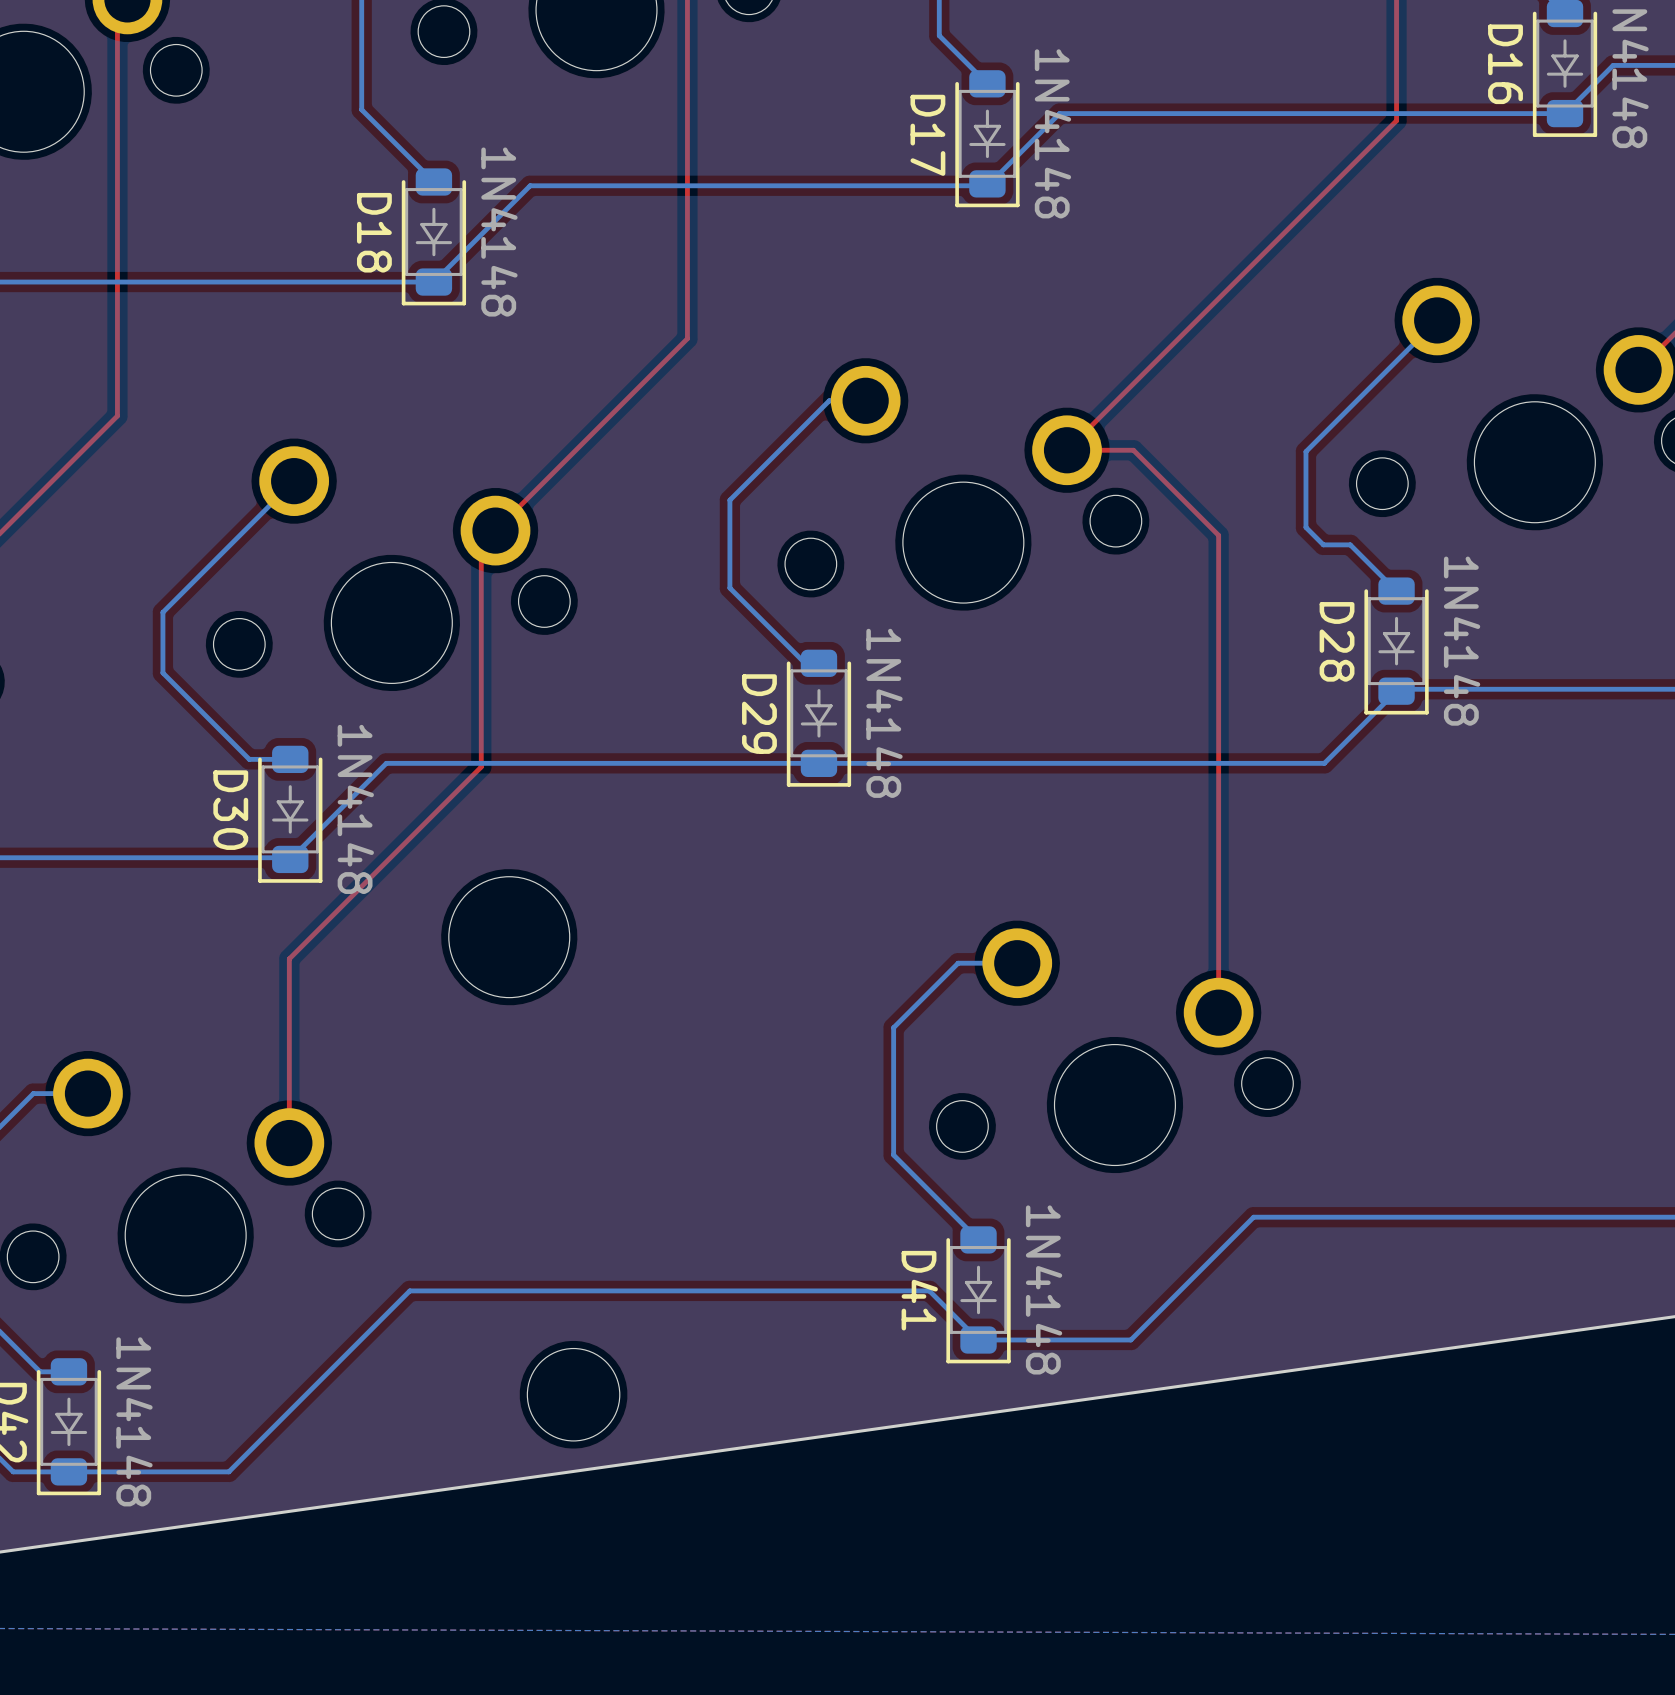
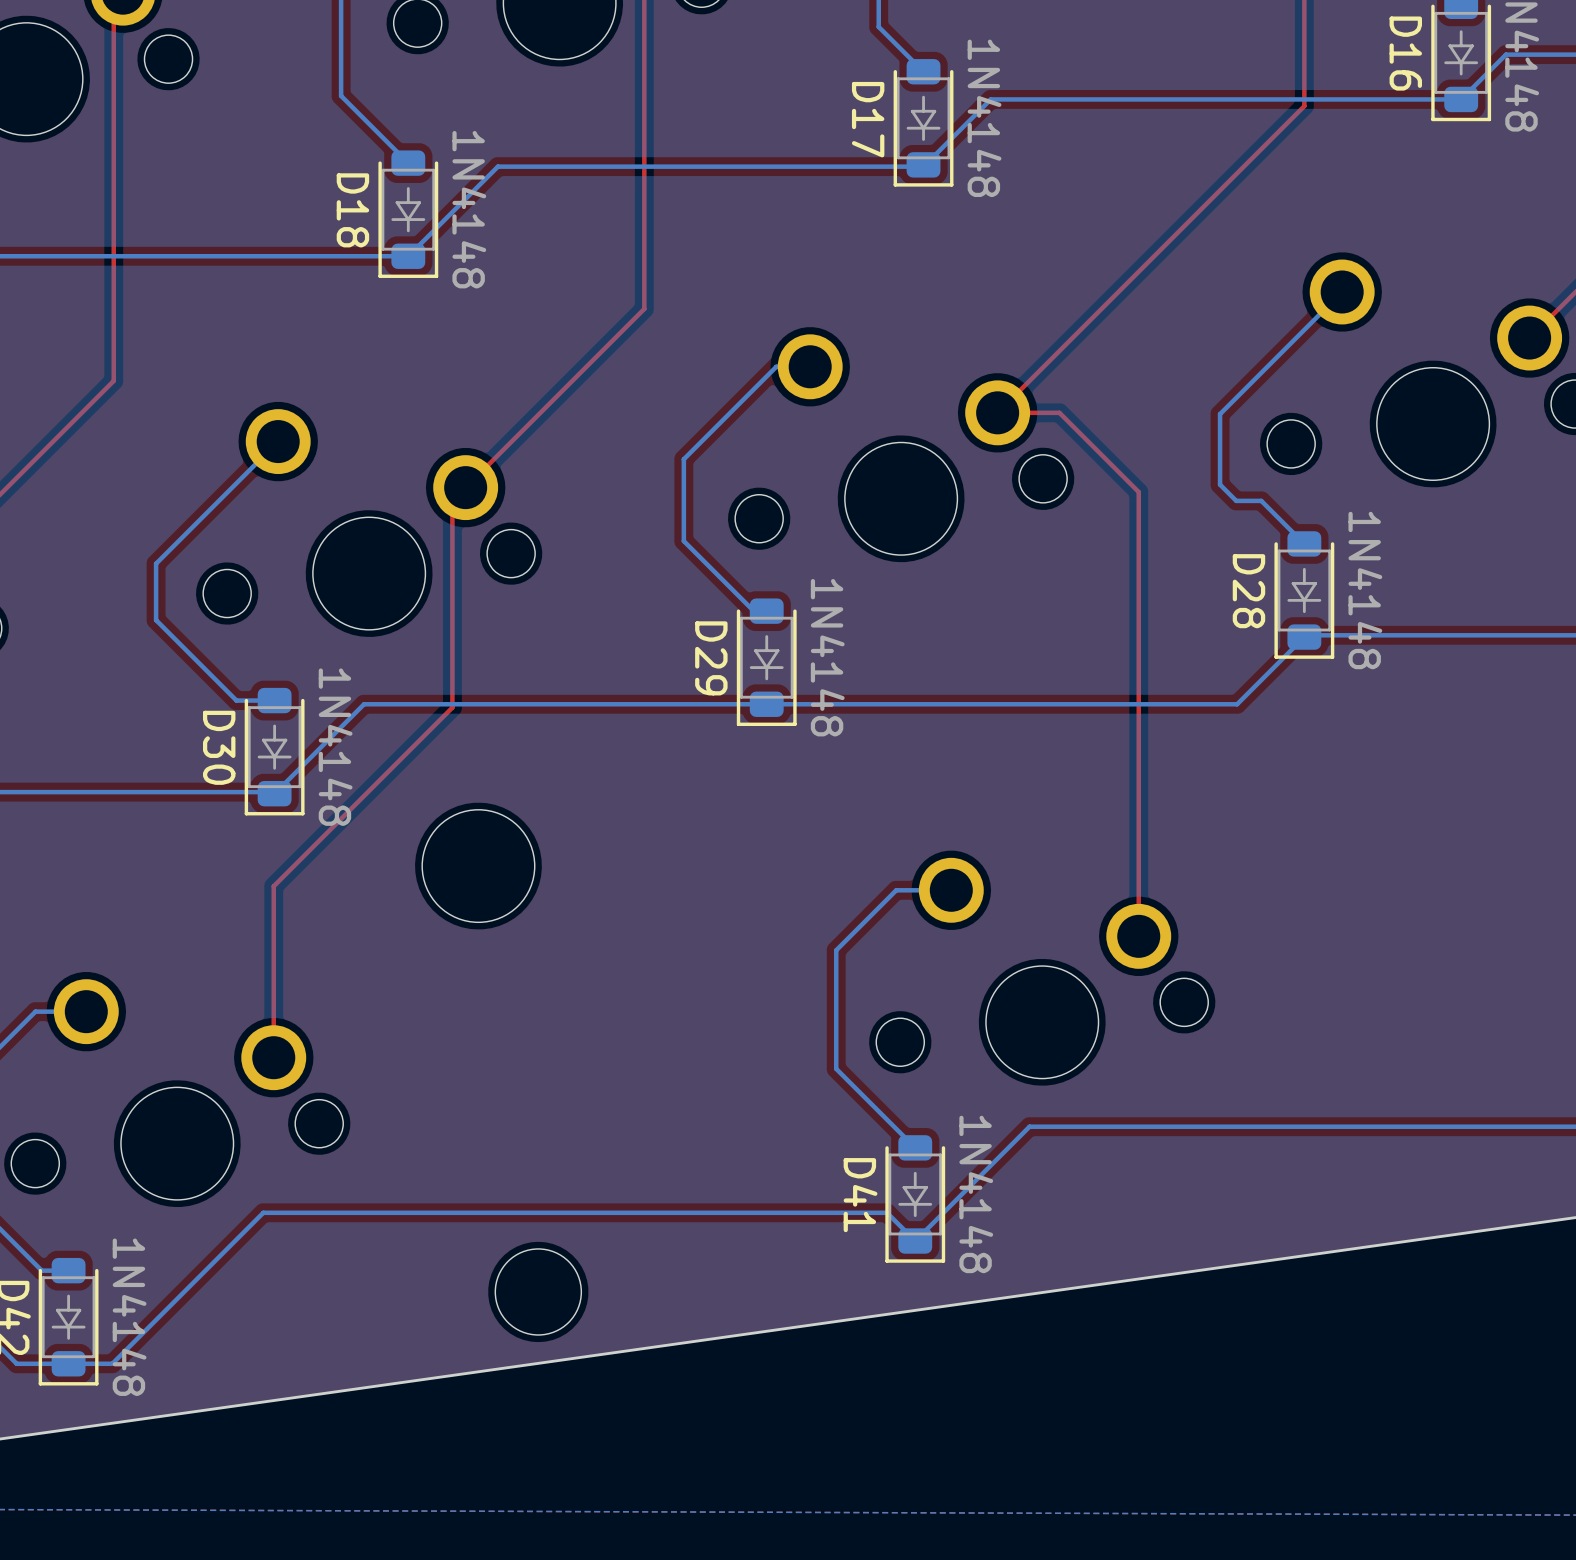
bottom track: (1253, 1217) (1130, 1339) (978, 1339) -> (1171, 1126) (1029, 1126) (915, 1241)
bottom track: (948, 1309) (929, 1290) (409, 1290) (228, 1471) (115, 1471) -> (887, 1212) (263, 1212) (112, 1363)

